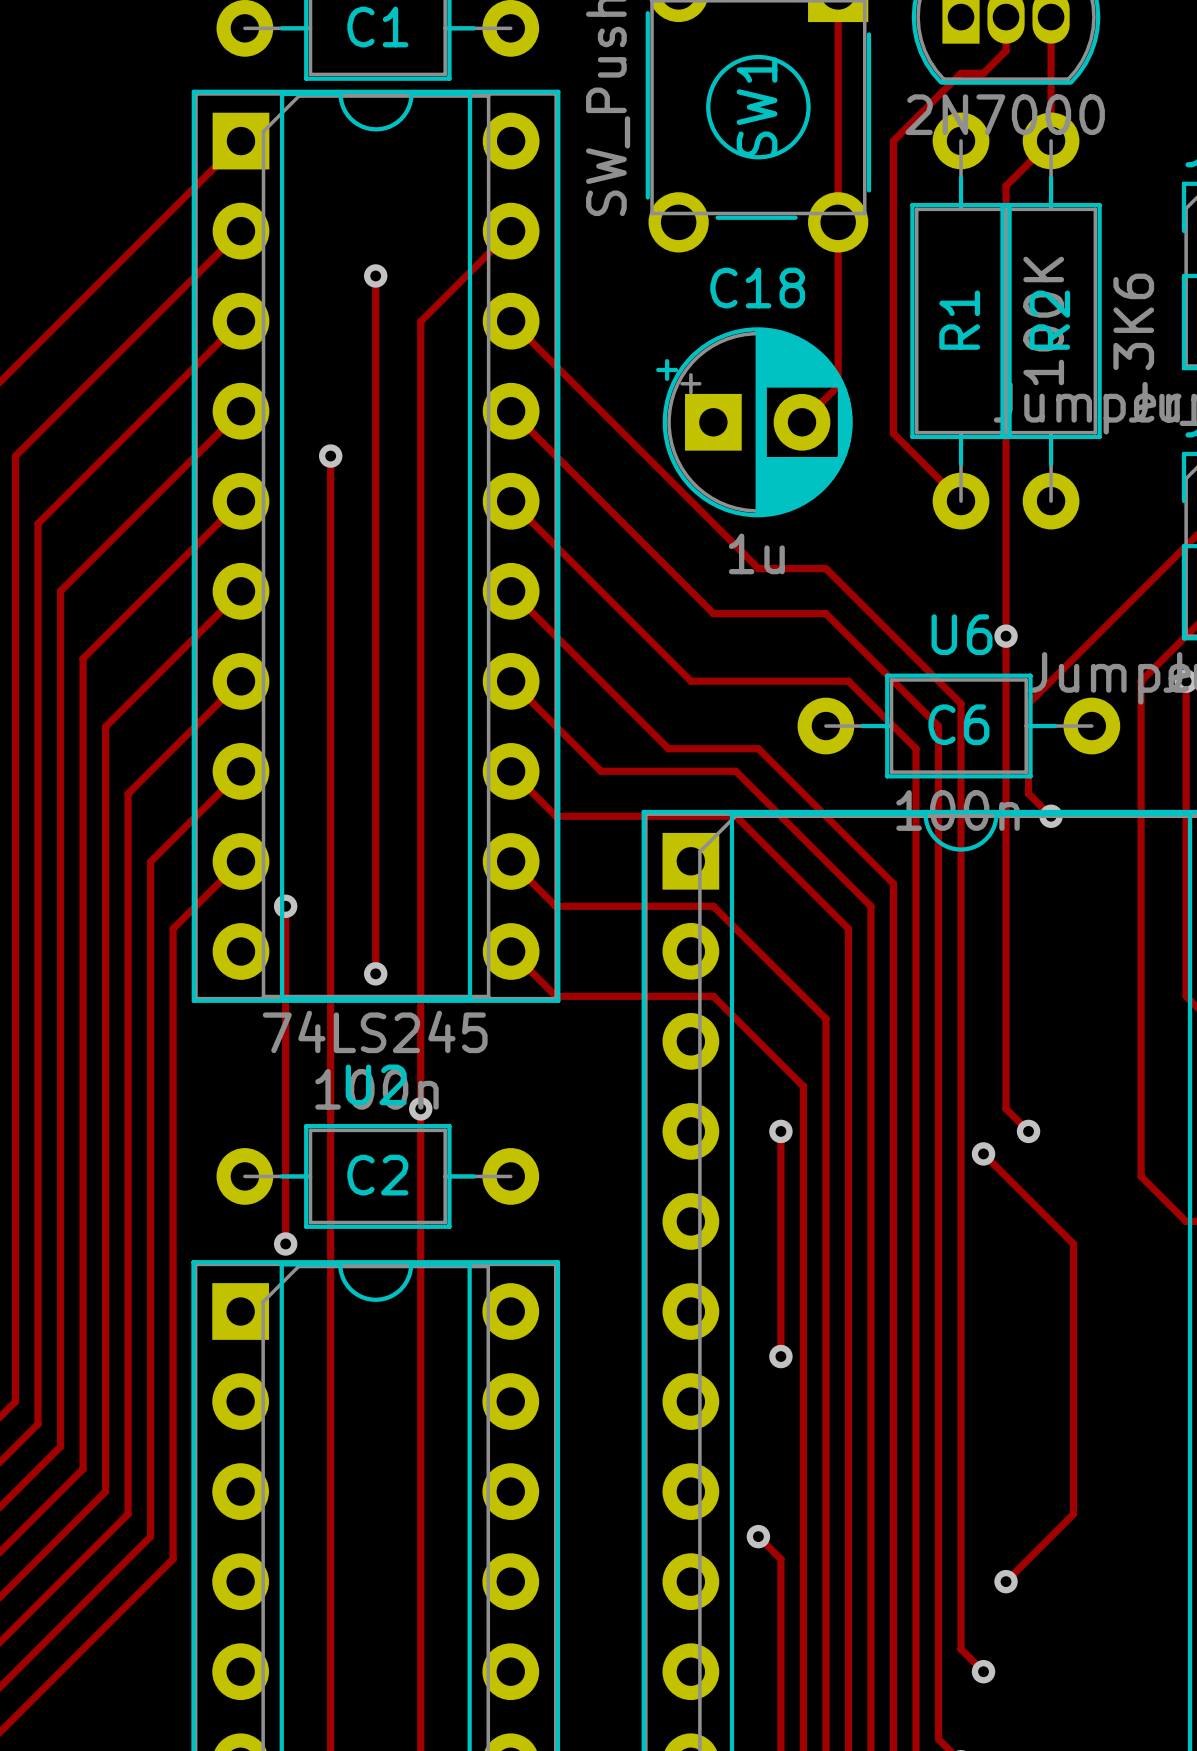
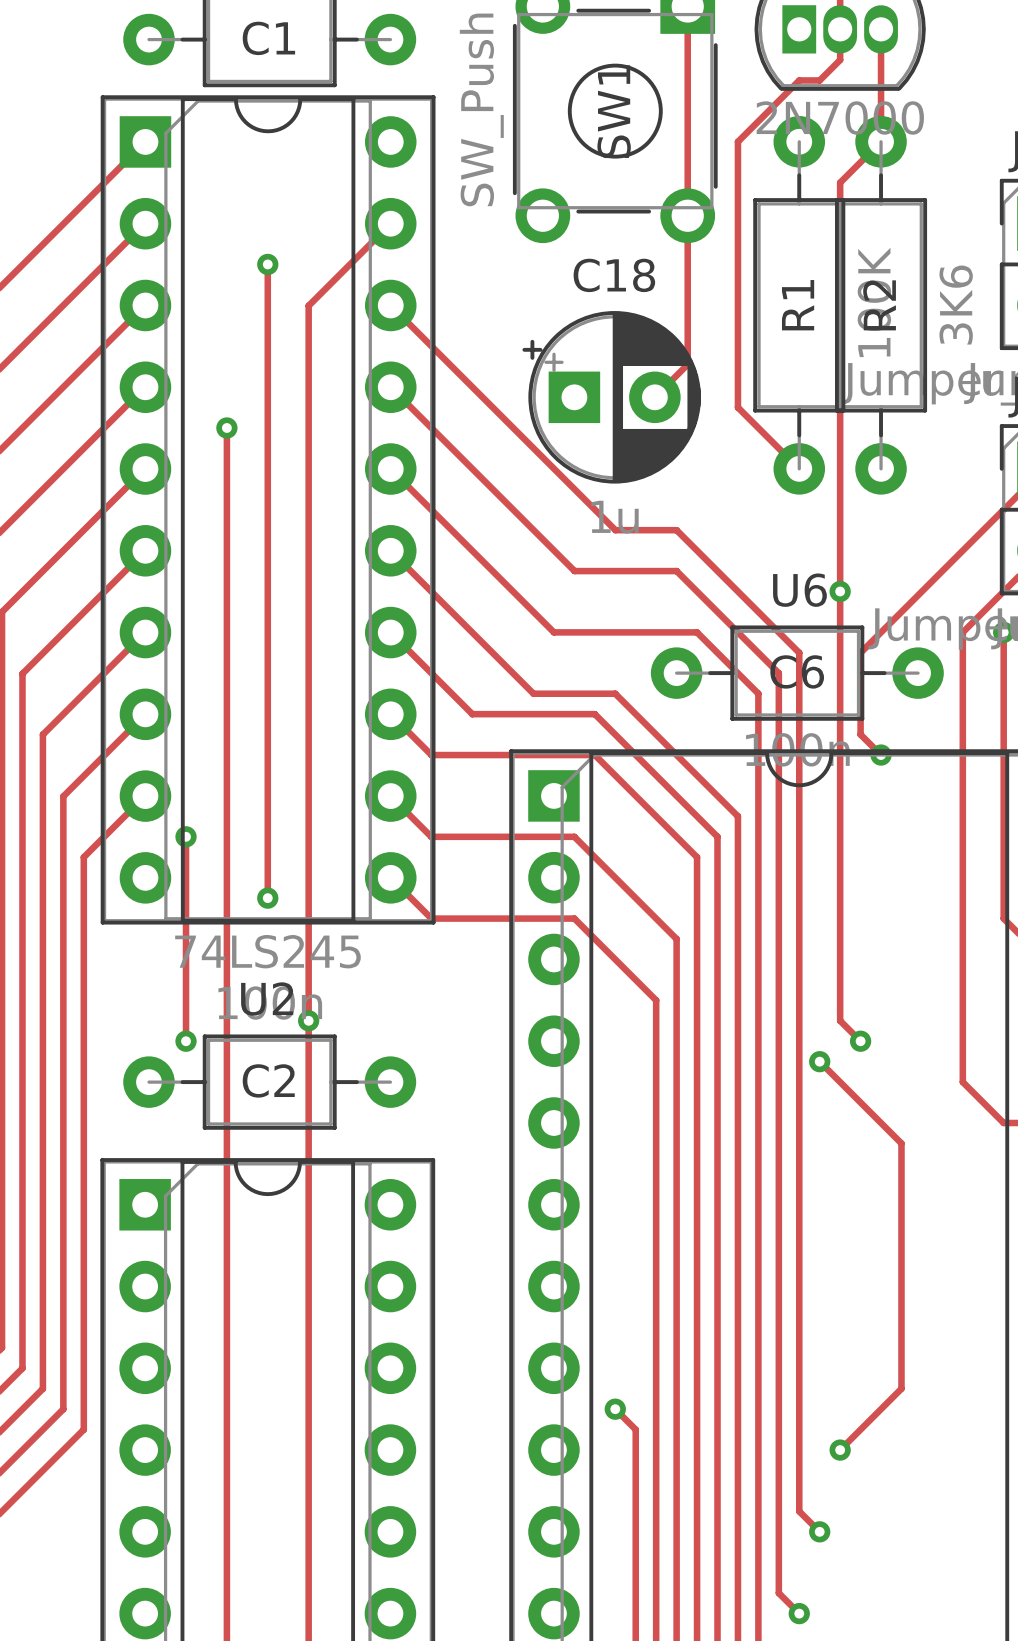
track: (285, 1131) (285, 1243) -> none
track: (780, 1131) (780, 1356) -> none
via: (780, 1131) -> none
via position: (285, 1243) -> (186, 1041)
via: (780, 1356) -> none

